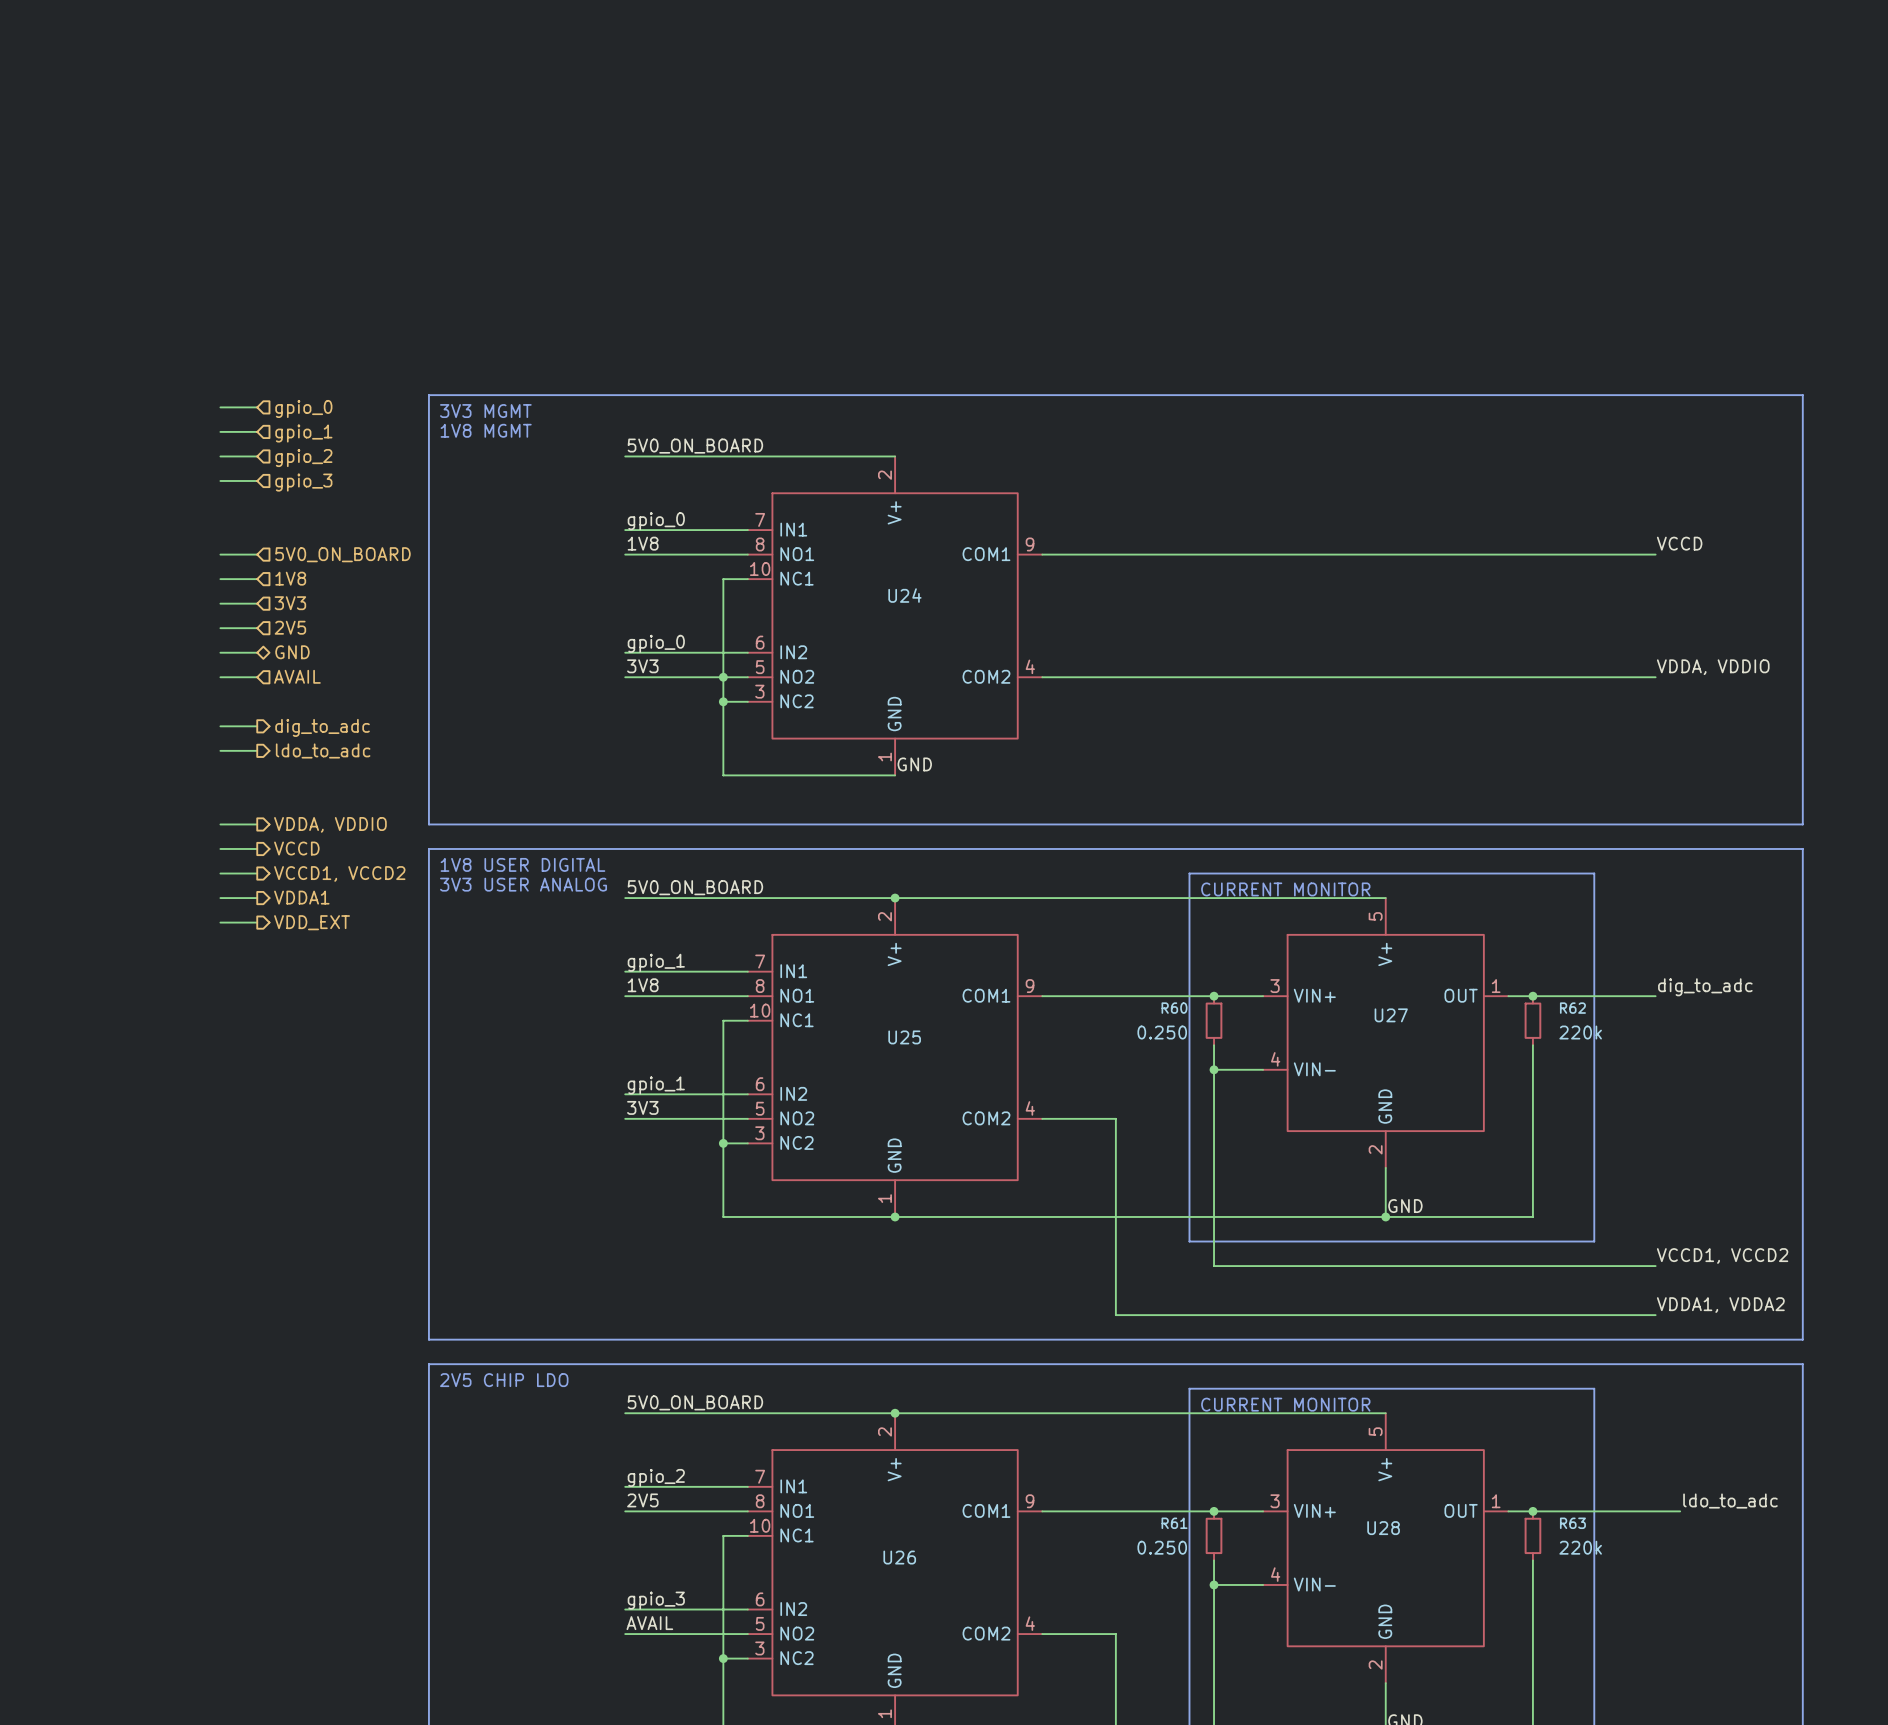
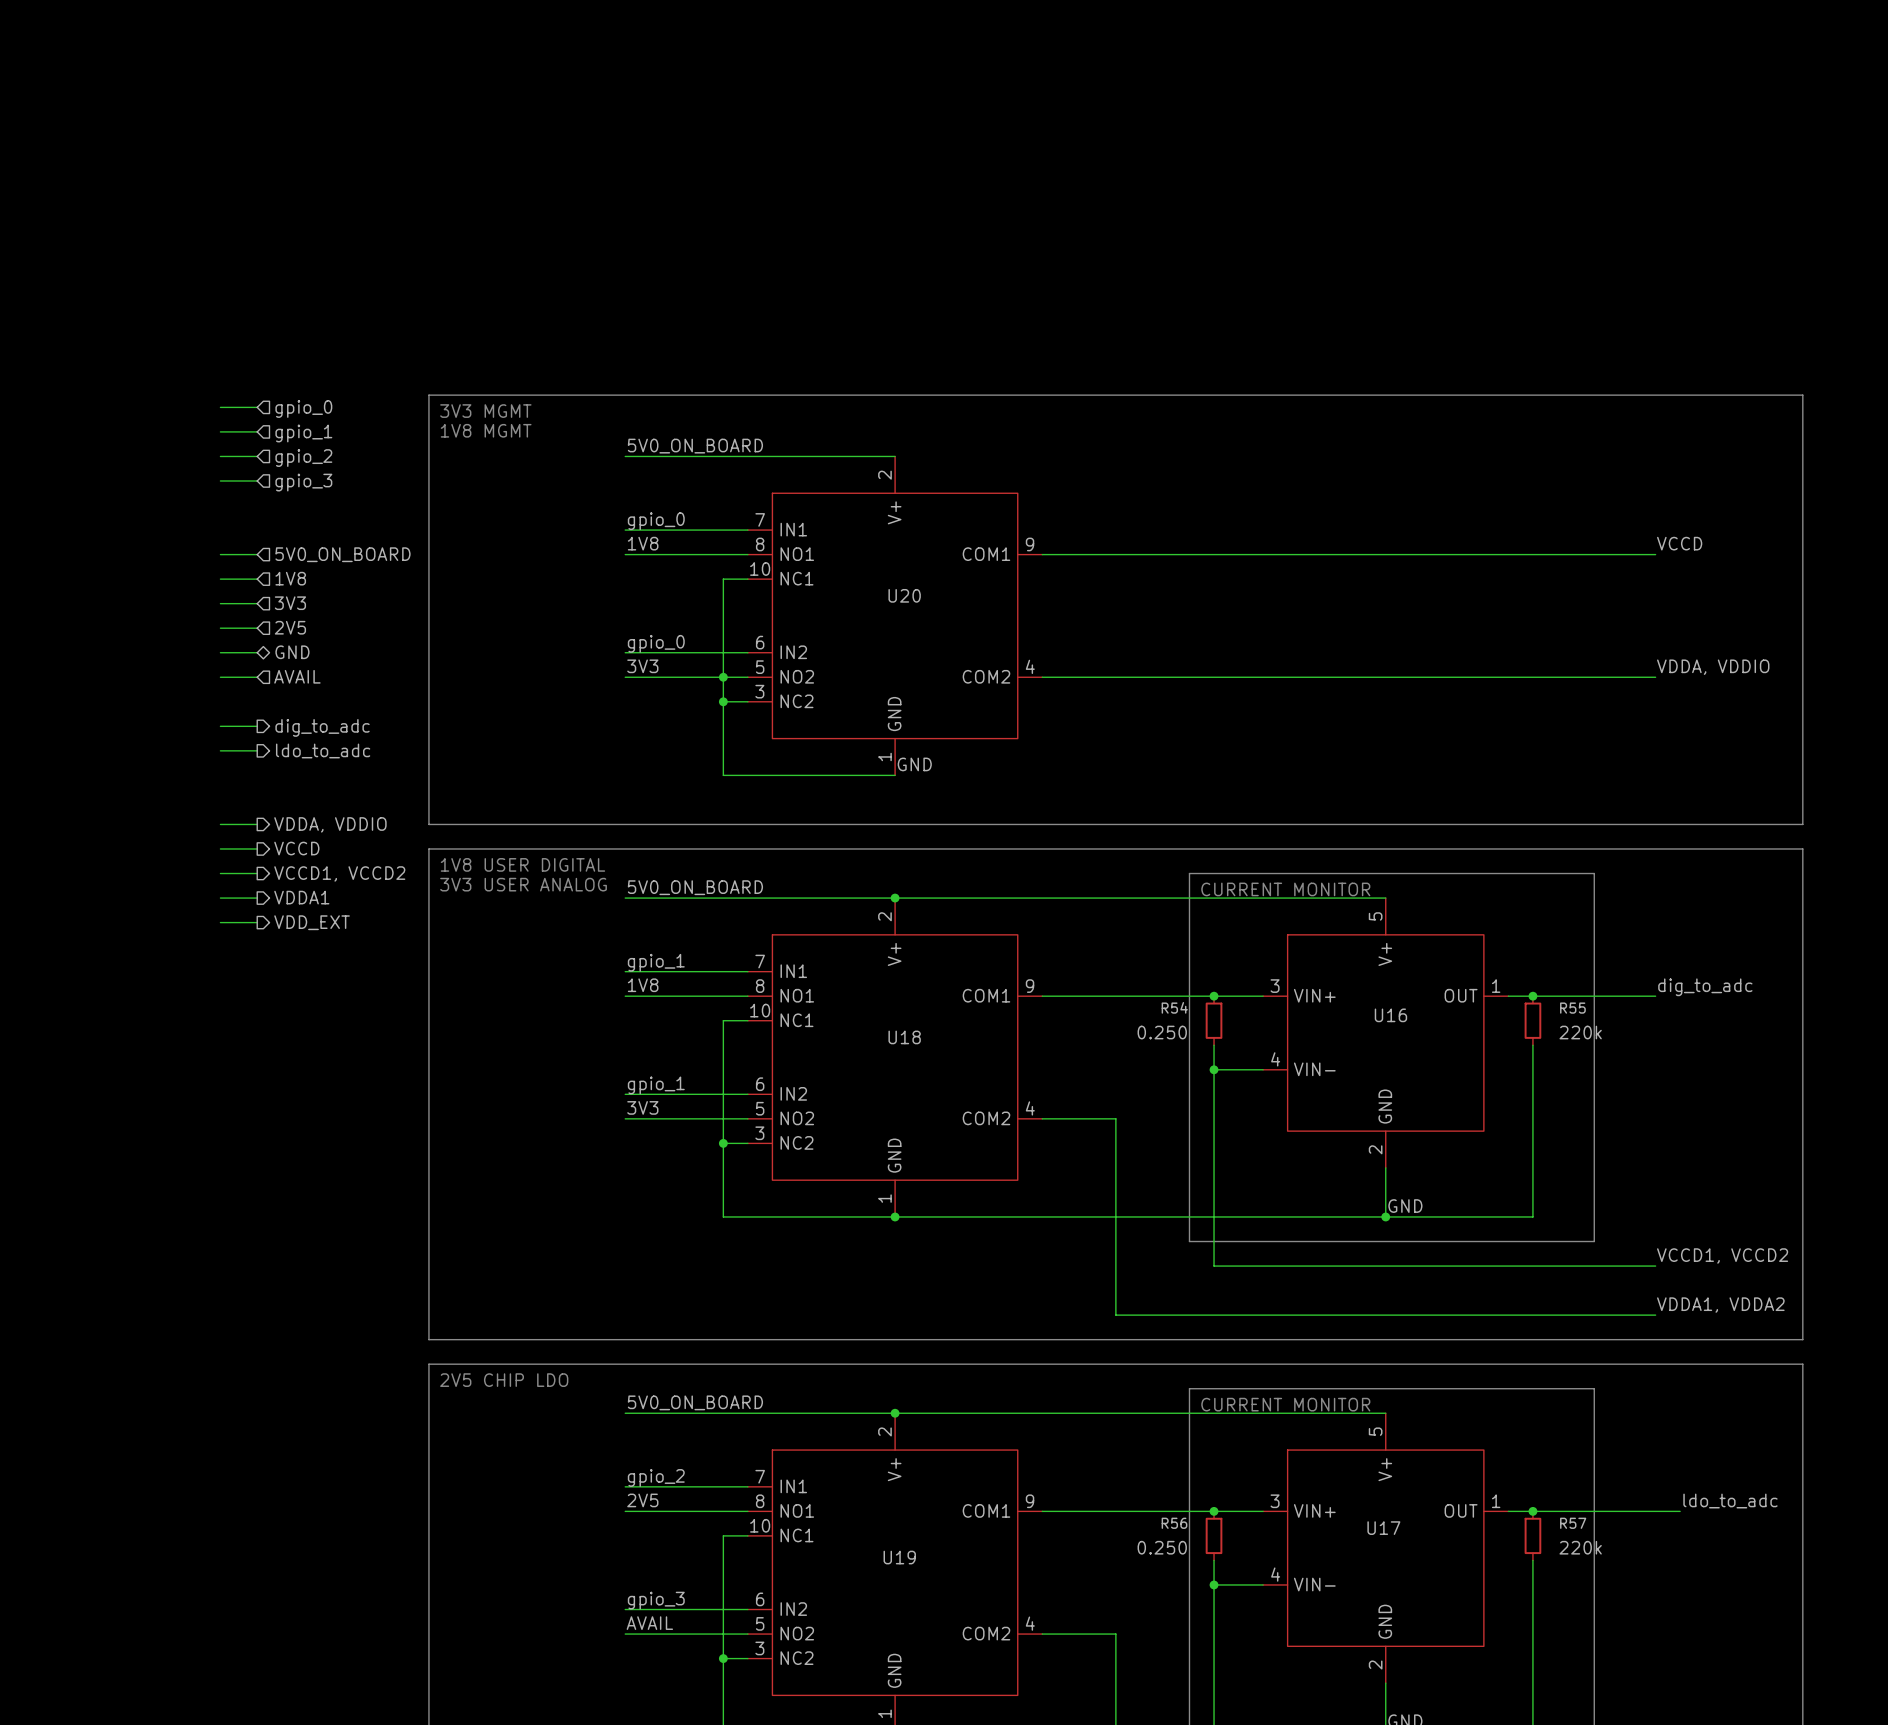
U24 name: U24 (904, 595) -> U20 (904, 595)
R60 name: R60 (1174, 1008) -> R54 (1174, 1007)
R62 name: R62 (1572, 1008) -> R55 (1572, 1008)
U27 name: U27 (1391, 1015) -> U16 (1390, 1015)
U25 name: U25 (904, 1037) -> U18 (904, 1037)
R61 name: R61 (1174, 1523) -> R56 (1174, 1523)
R63 name: R63 (1572, 1523) -> R57 (1573, 1523)
U28 name: U28 (1383, 1528) -> U17 (1383, 1528)
U26 name: U26 (899, 1557) -> U19 (899, 1557)

